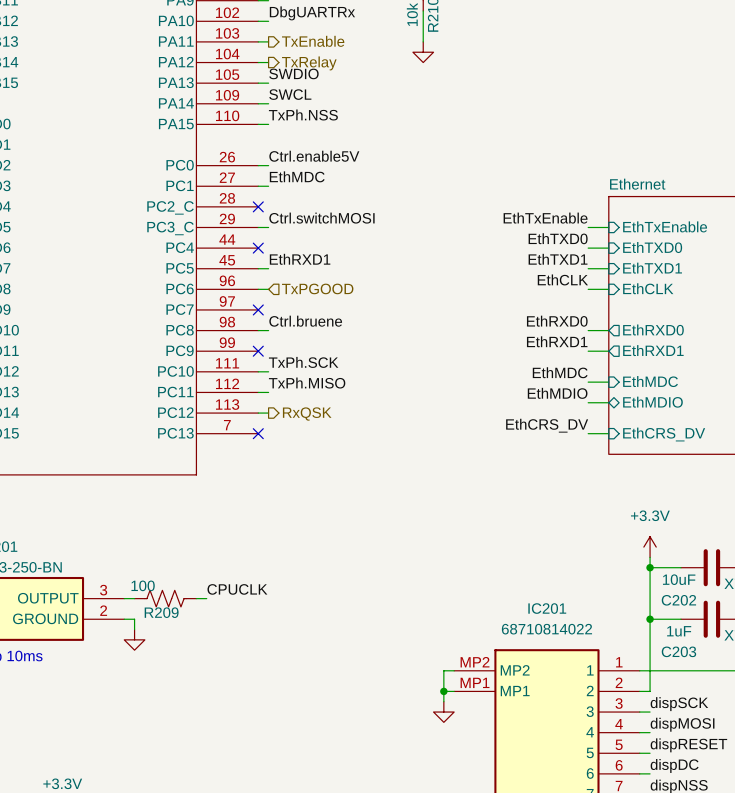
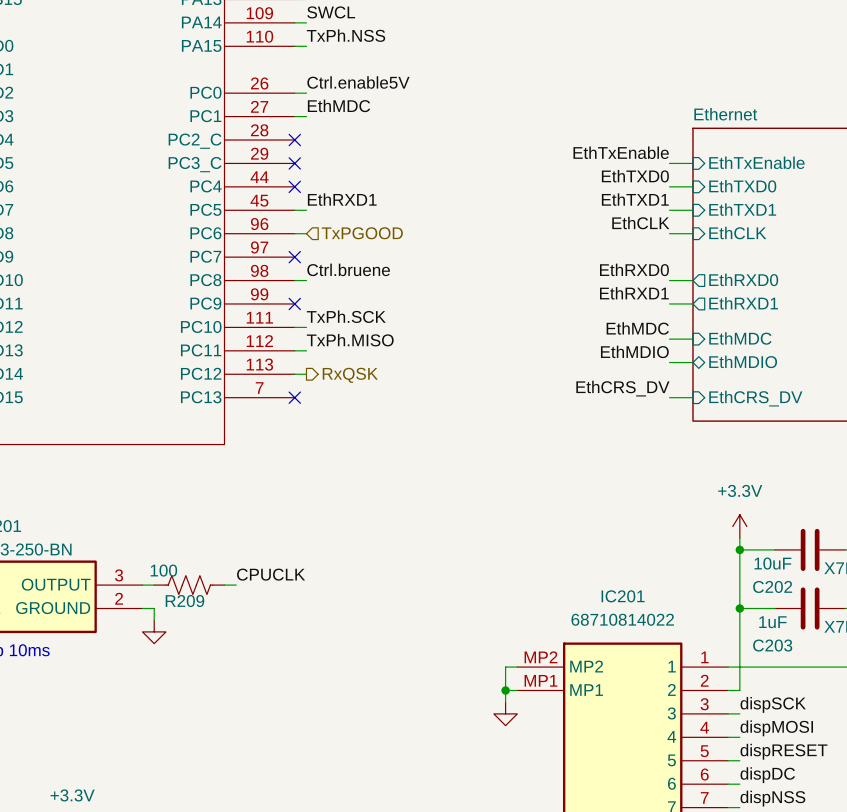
label: Ctrl.switchMOSI (321, 218) -> none
wire: (258, 227) (268, 227) -> none
no-connect mark: none -> (294, 163)

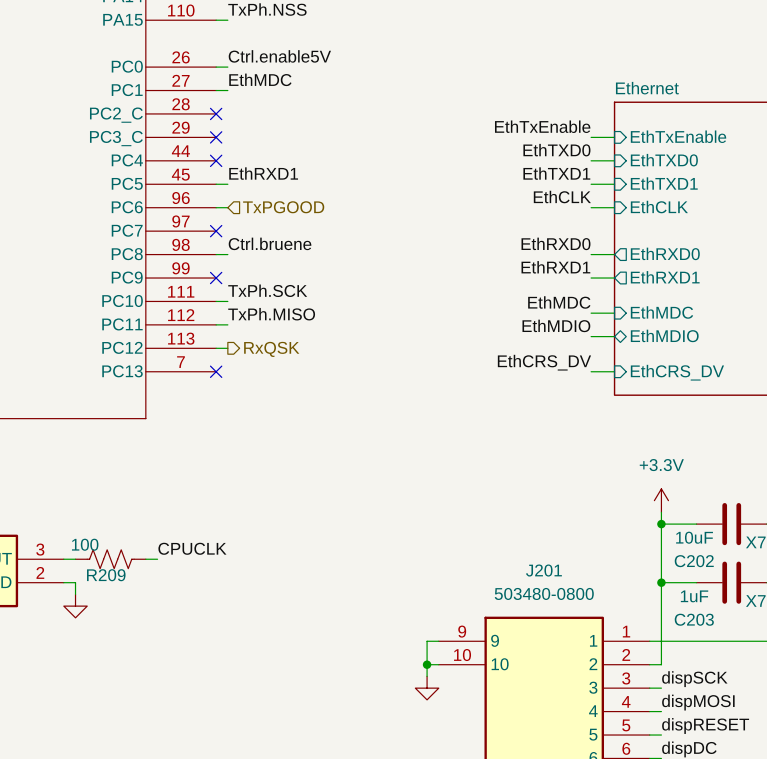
IC201 name: IC201 (623, 596) -> J201 (543, 570)
IC201 value: 68710814022 (622, 619) -> 503480-0800 (544, 593)
IC201 pin number: MP2 (541, 657) -> 9 (462, 631)
IC201 pin name: MP2 (586, 666) -> 9 (495, 640)
IC201 pin number: MP1 (541, 680) -> 10 (462, 655)
IC201 pin name: MP1 (586, 690) -> 10 (500, 664)

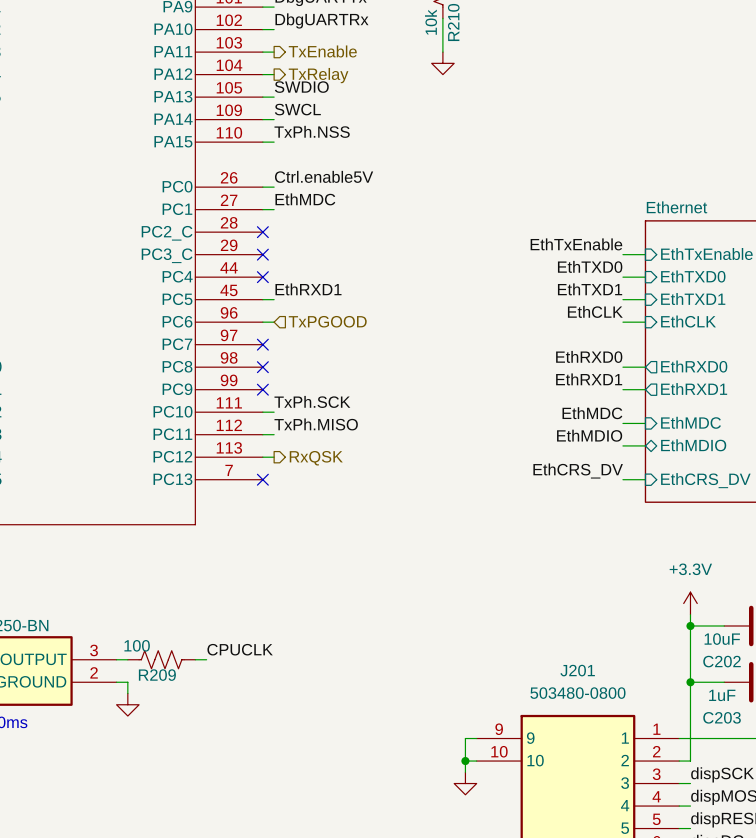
label: Ctrl.bruene (270, 243) -> none
wire: (216, 254) (227, 254) -> none
no-connect mark: none -> (262, 367)

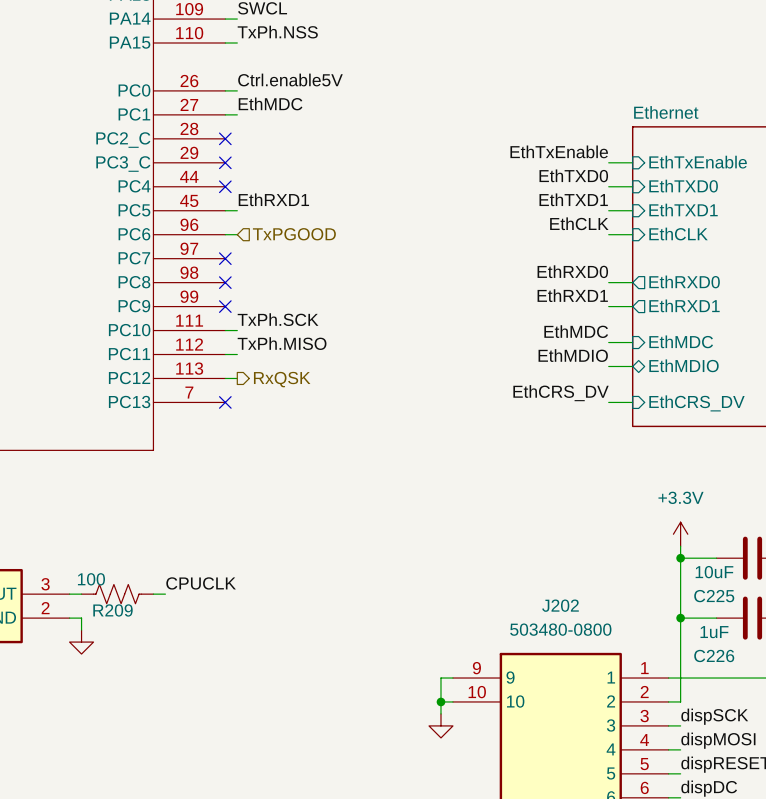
C202 name: C202 (721, 661) -> C225 (714, 596)
J201 name: J201 (577, 670) -> J202 (560, 605)
C203 name: C203 (722, 717) -> C226 (714, 655)

